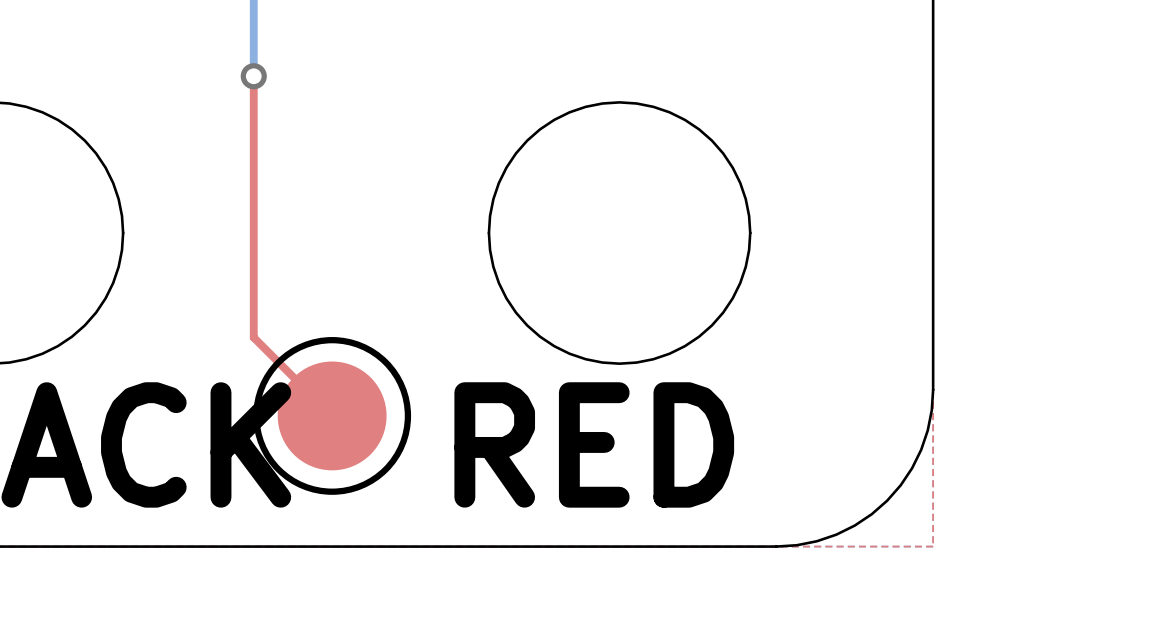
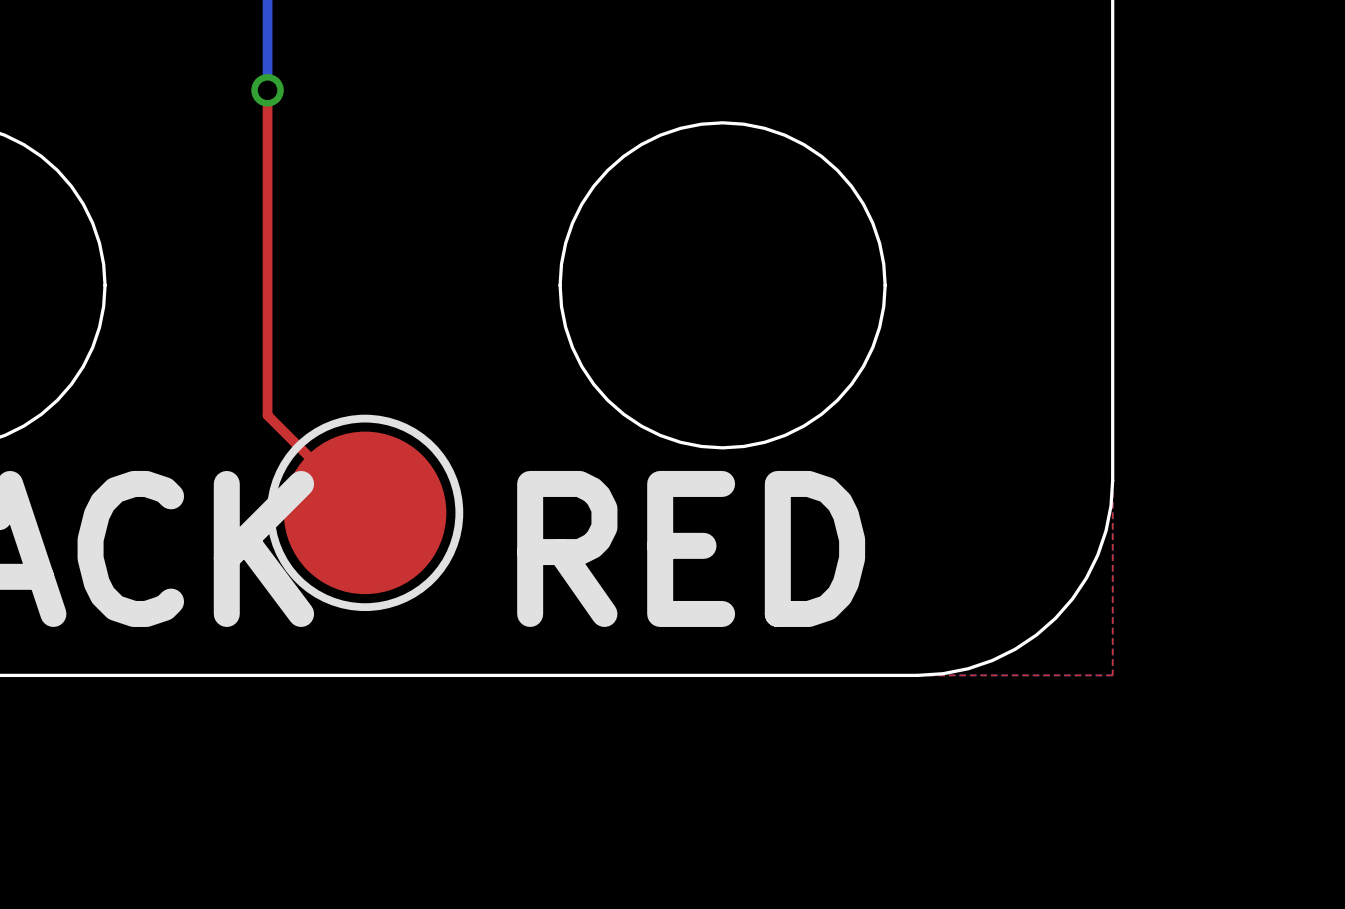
part footprint: [253, 337, 412, 495] -> [266, 414, 464, 612]

